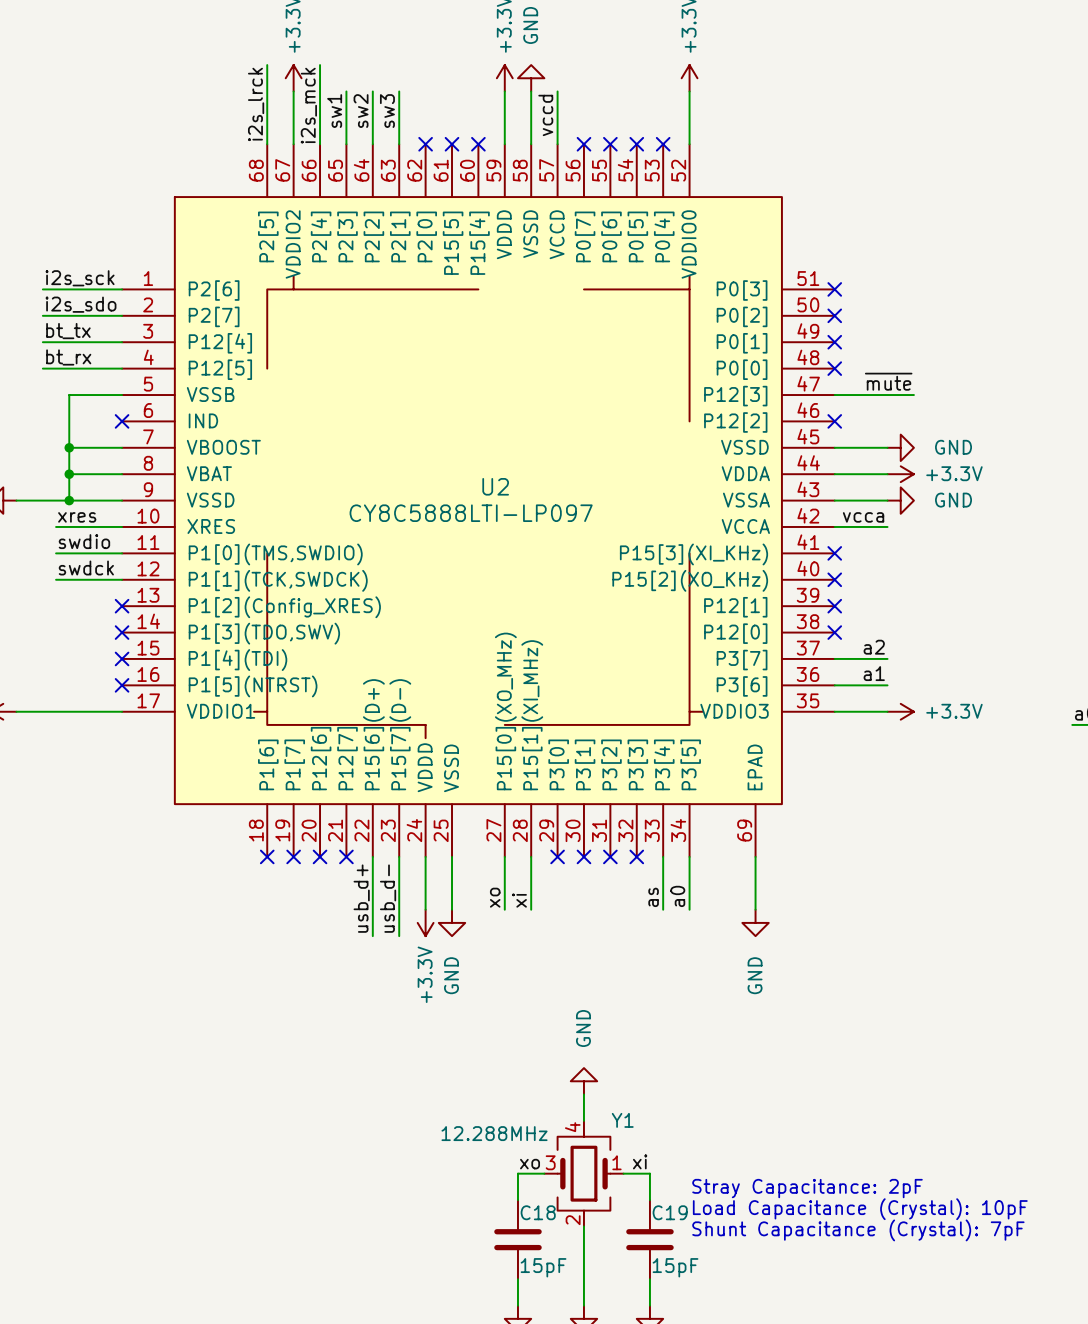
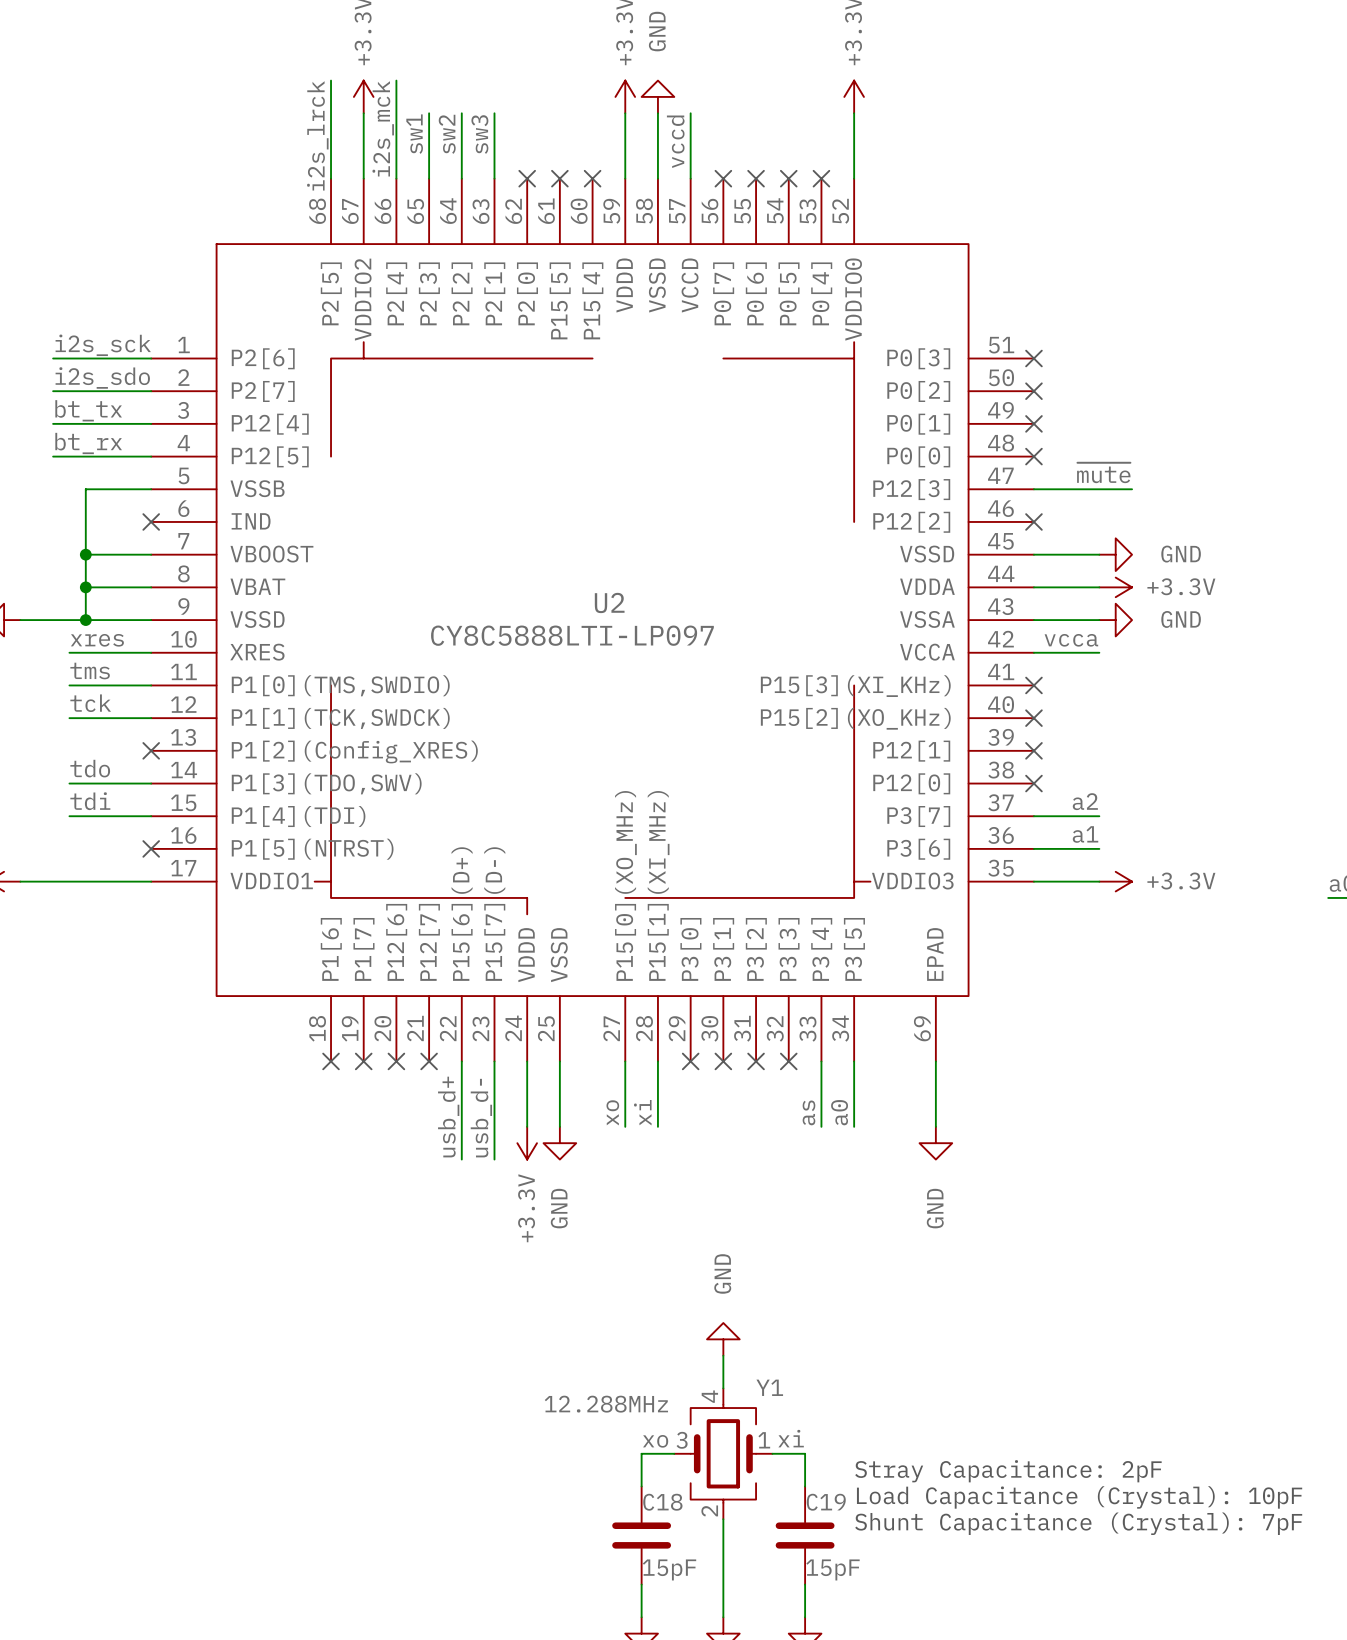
label: swdio (84, 541) -> tms (90, 671)
label: swdck (86, 568) -> tck (90, 703)
label: none -> tdo (90, 768)
wire: none -> (69, 783) (151, 783)
no-connect mark: (122, 632) -> none
label: none -> tdi (90, 801)
wire: none -> (69, 816) (151, 816)
no-connect mark: (122, 658) -> none

